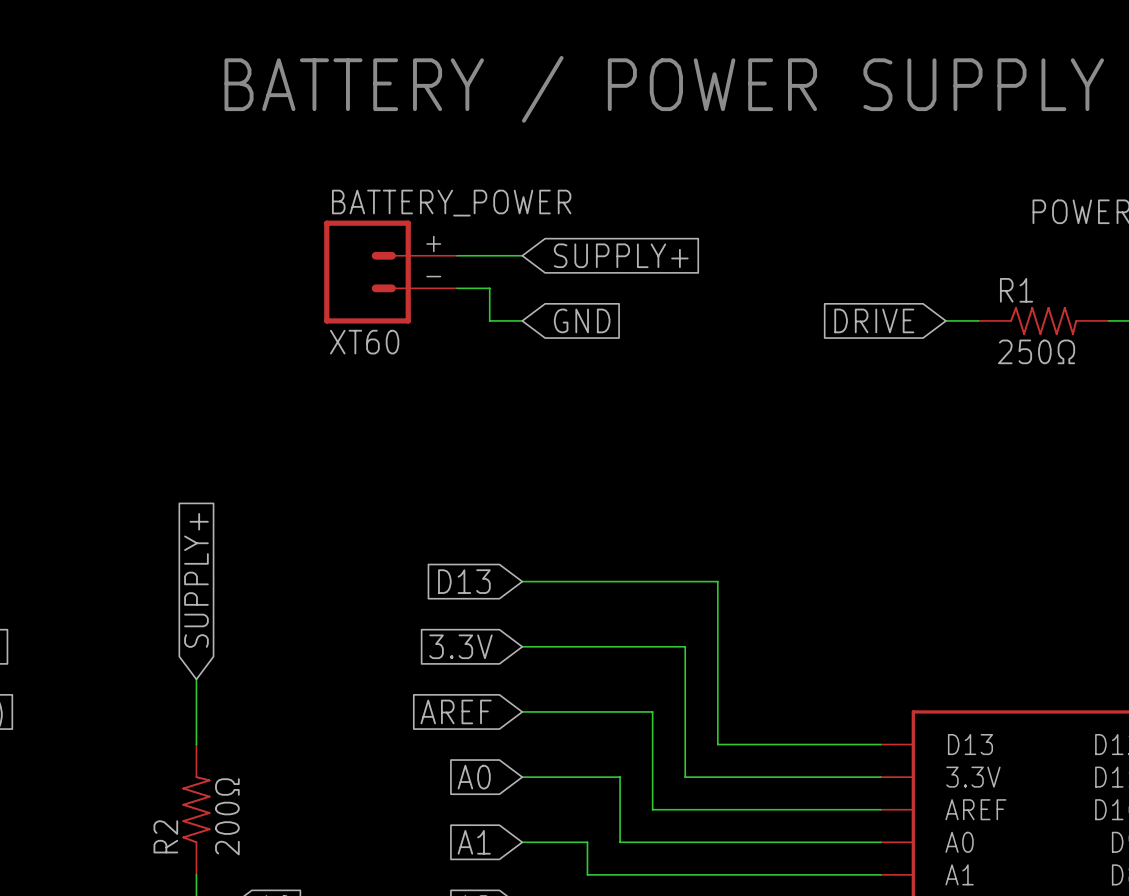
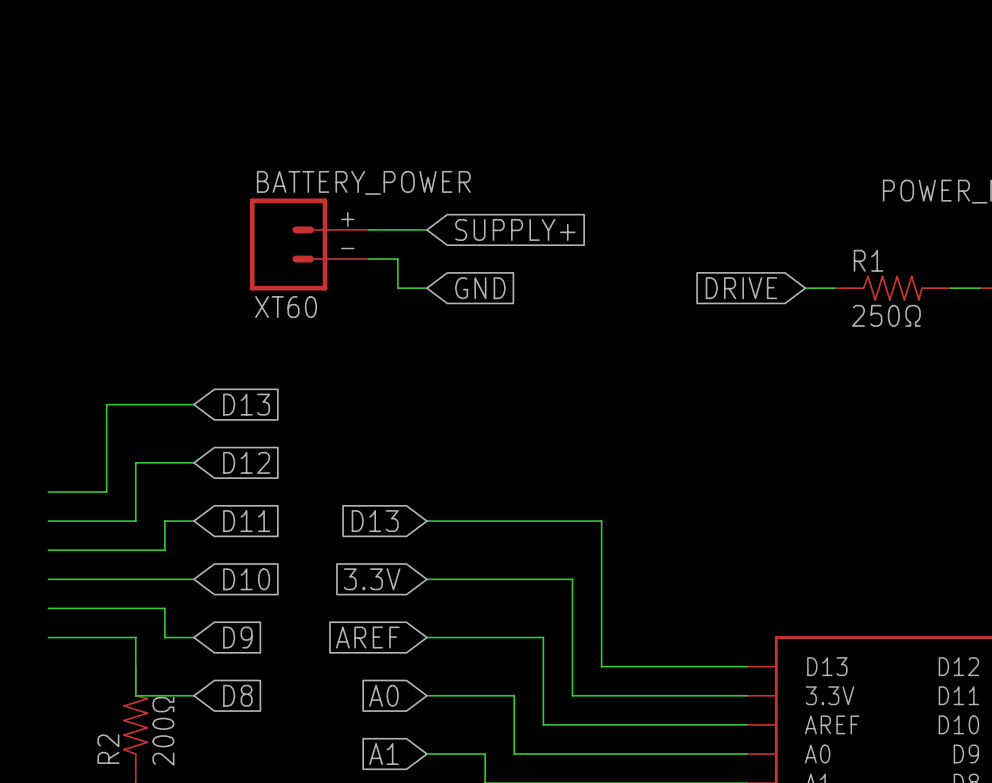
text: BATTERY / POWER SUPPLY (664, 89) -> none
wire: none -> (194, 404) (106, 404) (106, 491) (48, 491)
global label: none -> D13 (246, 404)
wire: none -> (194, 462) (135, 462) (135, 521) (48, 521)
global label: none -> D12 (246, 462)
global label: SUPPLY+ (196, 580) -> none
wire: none -> (194, 521) (164, 521) (164, 550) (48, 550)
global label: none -> D11 (246, 521)
wire: none -> (48, 579) (194, 579)
global label: none -> D10 (246, 579)
wire: none -> (48, 608) (164, 608) (164, 637) (194, 637)
wire: (196, 679) (196, 711) -> (48, 637) (135, 637)
global label: none -> D9 (237, 637)
wire: none -> (135, 666) (135, 695) (194, 695)
global label: none -> D8 (237, 695)

